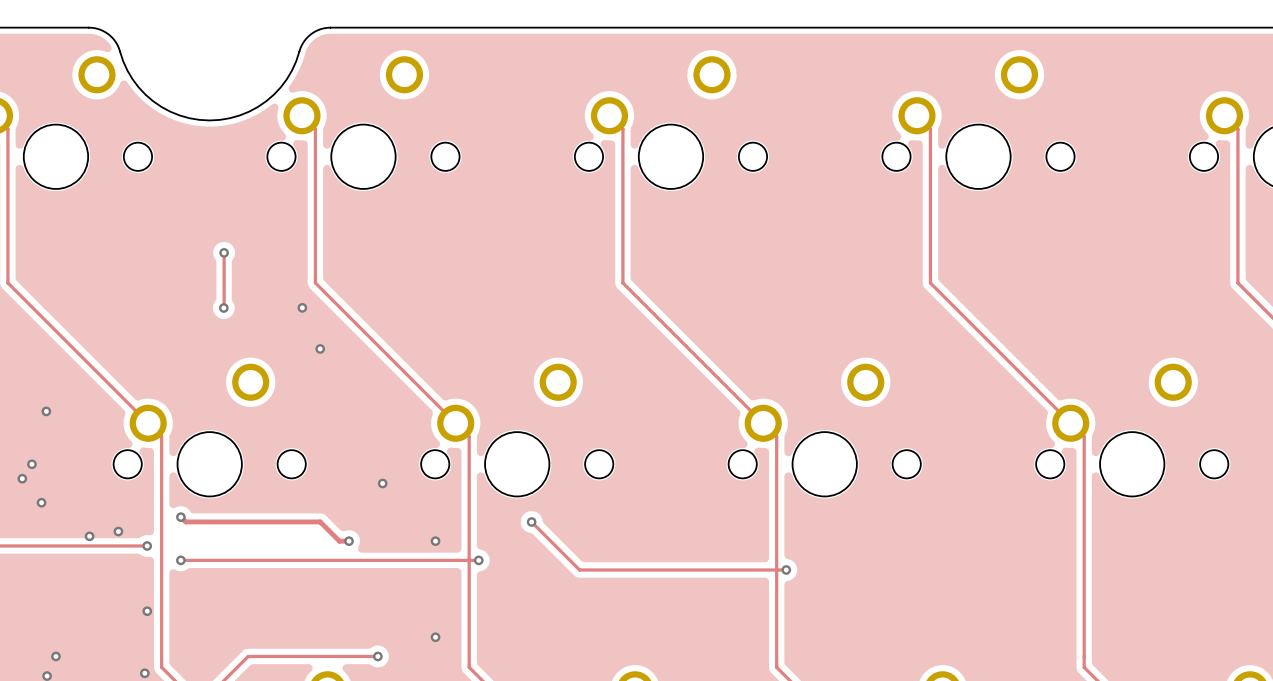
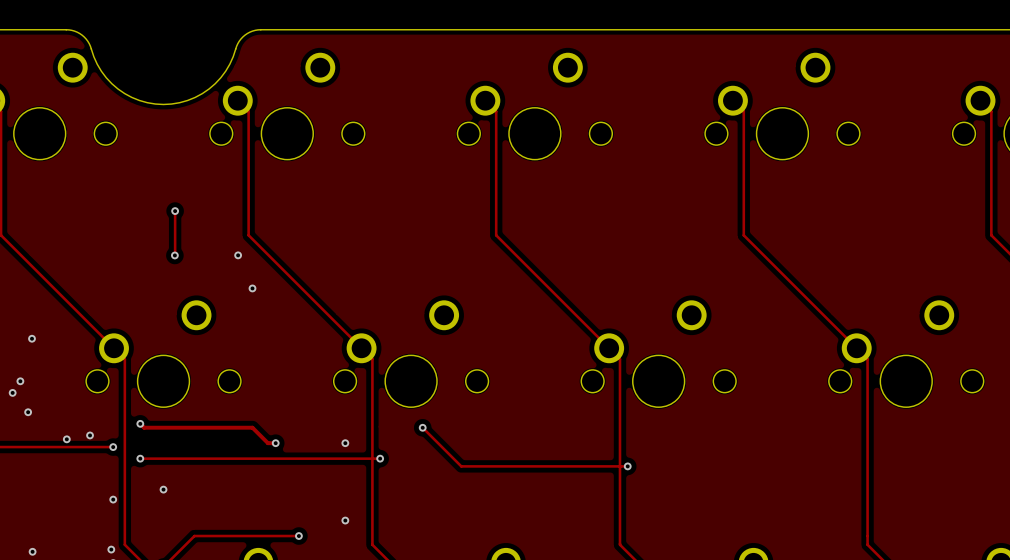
via: (382, 483) -> none
via: none -> (163, 489)
via: (55, 656) -> none

